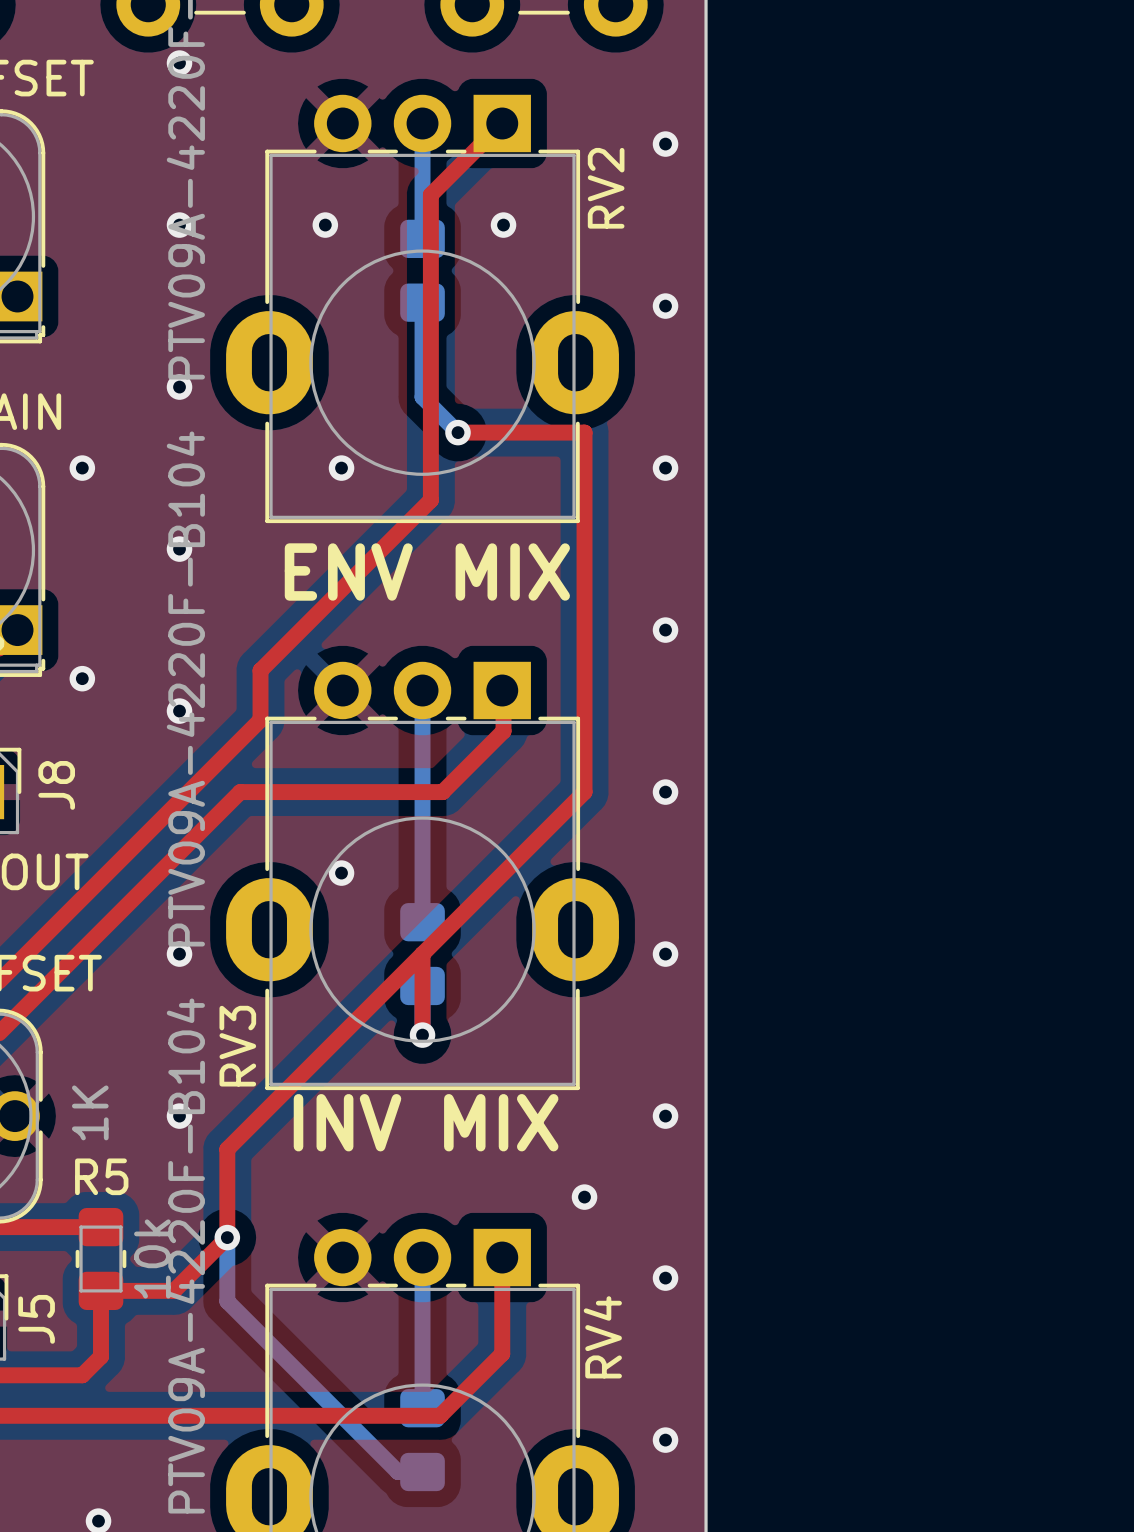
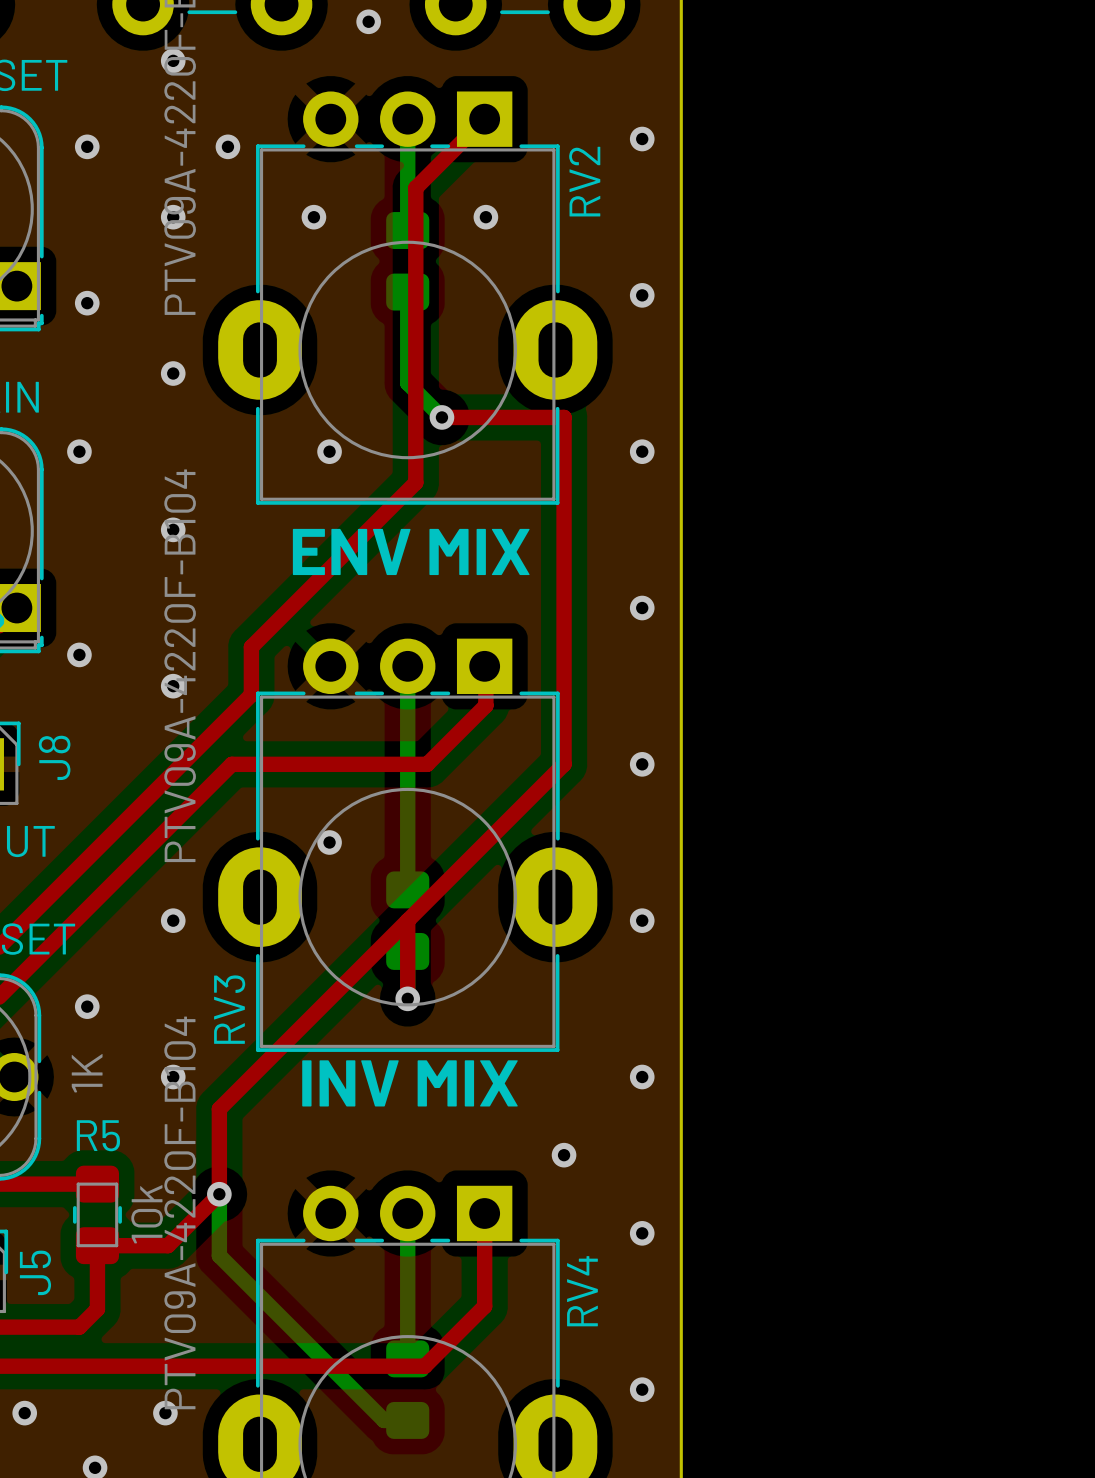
via: none -> (368, 21)
via: none -> (87, 146)
via: none -> (227, 146)
via: none -> (87, 303)
via: none -> (87, 1006)
via: none -> (24, 1413)
via: none -> (165, 1413)

